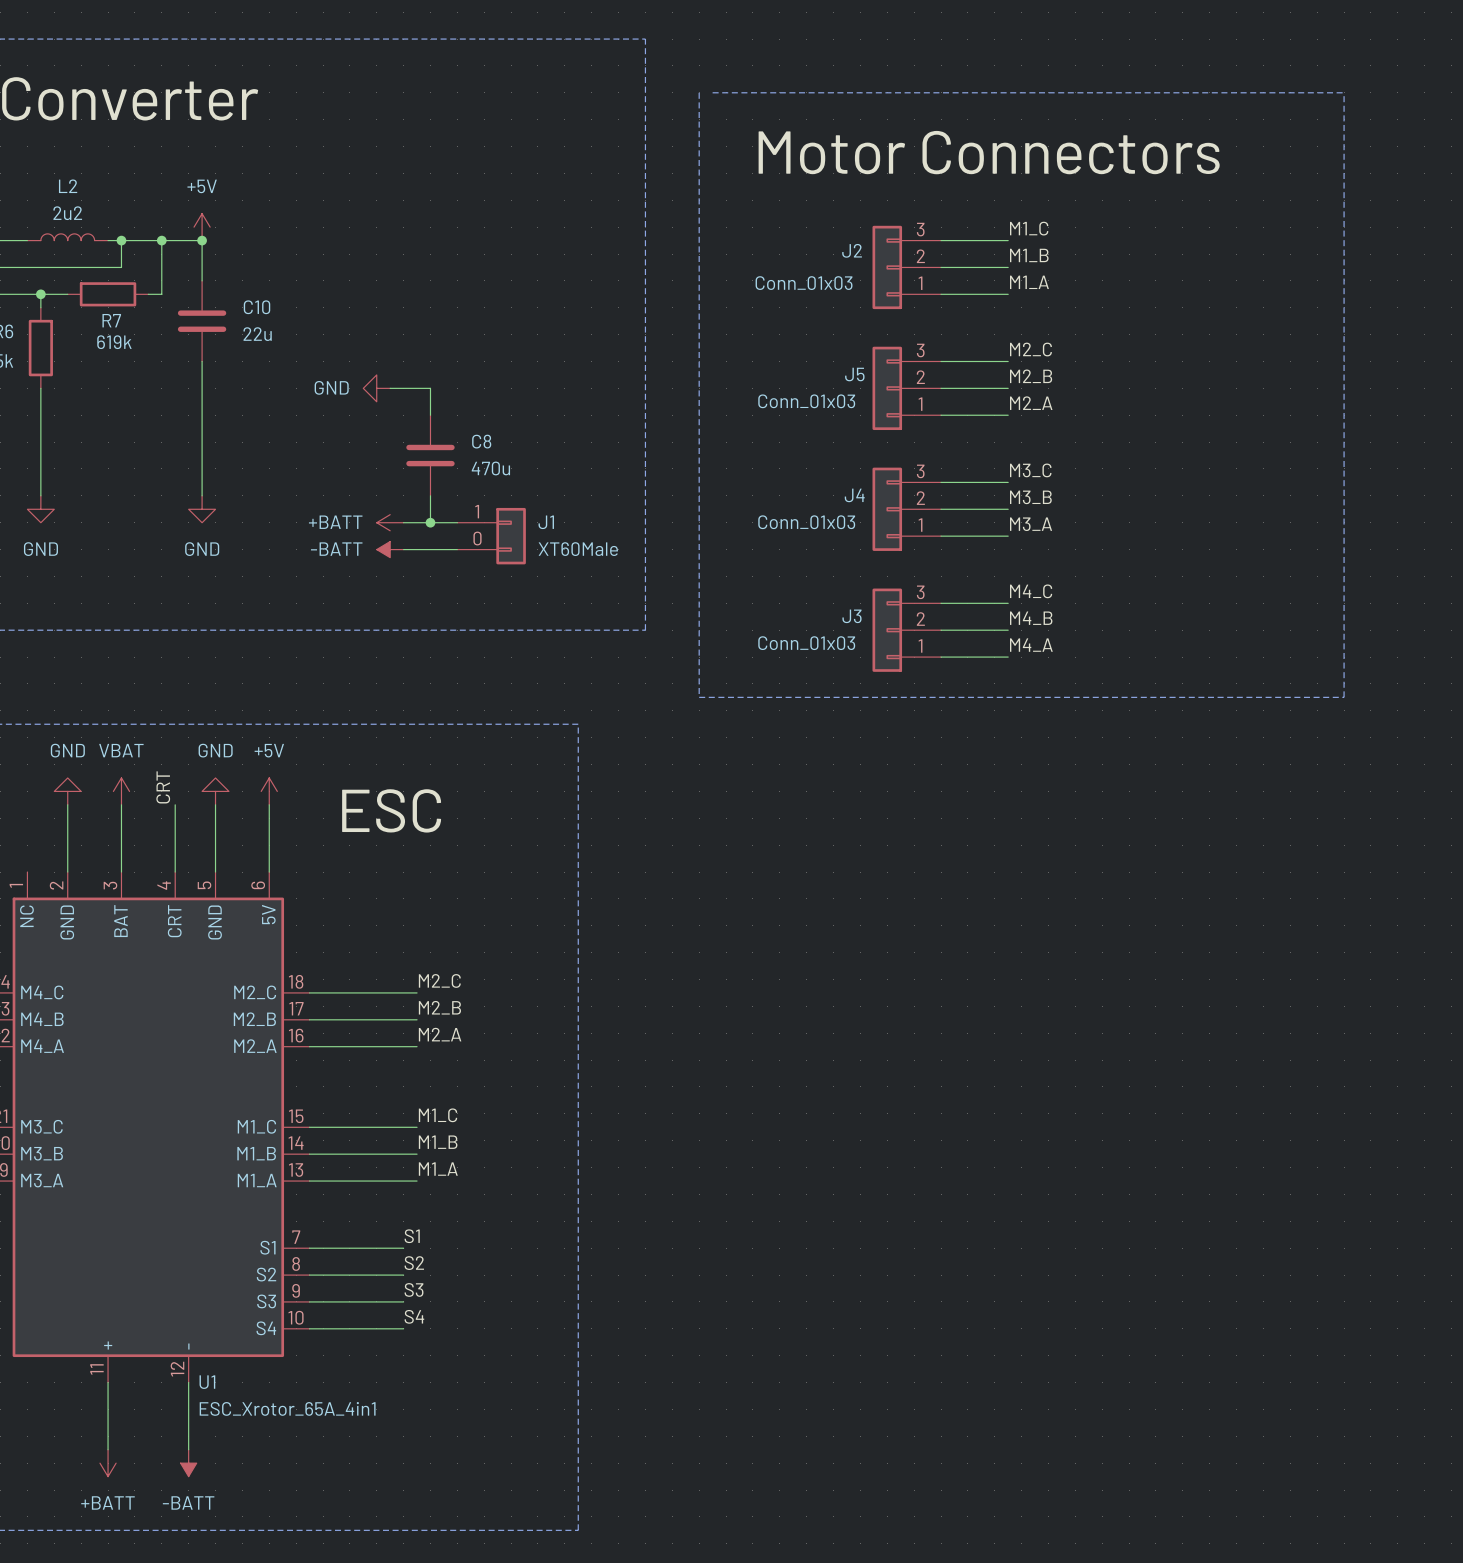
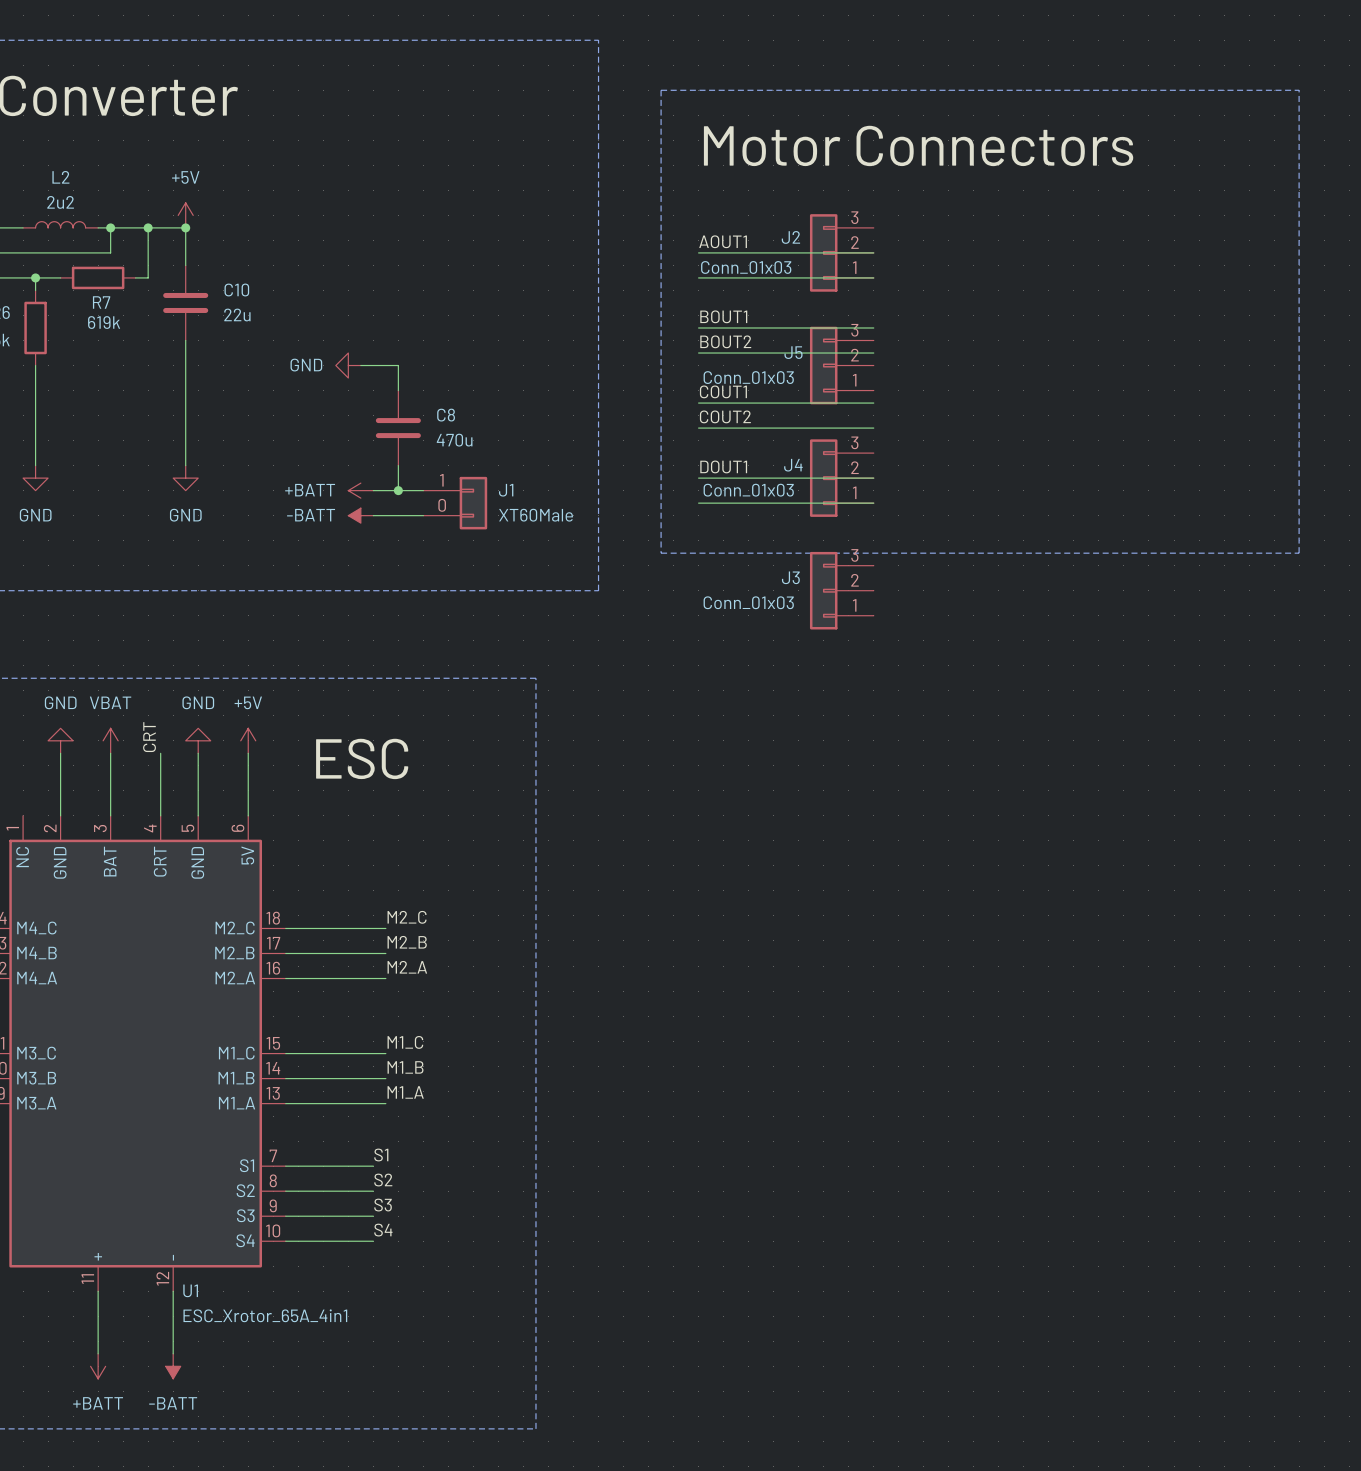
line: (699, 92) (699, 697) (1344, 697) (1344, 92) -> (661, 90) (661, 553) (1299, 553) (1299, 90) (1249, 90)
label: M1_C (1029, 228) -> none
wire: (941, 240) (1008, 240) -> none
label: none -> AOUT1 (723, 241)
label: M1_B (1029, 255) -> none
wire: (941, 267) (1008, 267) -> (873, 252) (698, 252)
label: M1_A (1029, 282) -> none
wire: (941, 294) (1008, 294) -> (873, 277) (698, 277)
label: none -> BOUT1 (723, 316)
wire: none -> (698, 327) (873, 327)
label: M2_C (1030, 349) -> none
wire: (941, 361) (1008, 361) -> none
label: none -> BOUT2 (725, 341)
wire: none -> (698, 353) (873, 353)
label: M2_B (1031, 376) -> none
wire: (941, 388) (1008, 388) -> none
label: M2_A (1031, 403) -> none
wire: (941, 415) (1008, 415) -> none
label: none -> COUT1 (723, 391)
wire: none -> (698, 403) (873, 403)
label: none -> COUT2 (725, 416)
wire: none -> (698, 428) (873, 428)
label: M3_C (1030, 470) -> none
wire: (941, 482) (1008, 482) -> none
label: none -> DOUT1 (723, 466)
label: M3_B (1030, 497) -> none
wire: (941, 509) (1008, 509) -> (873, 478) (698, 478)
label: M3_A (1031, 524) -> none
wire: (941, 536) (1008, 536) -> (873, 503) (698, 503)
label: M4_C (1031, 591) -> none
wire: (941, 603) (1008, 603) -> none
label: M4_B (1031, 618) -> none
wire: (941, 630) (1008, 630) -> none
label: M4_A (1031, 645) -> none
wire: (941, 657) (1008, 657) -> none

